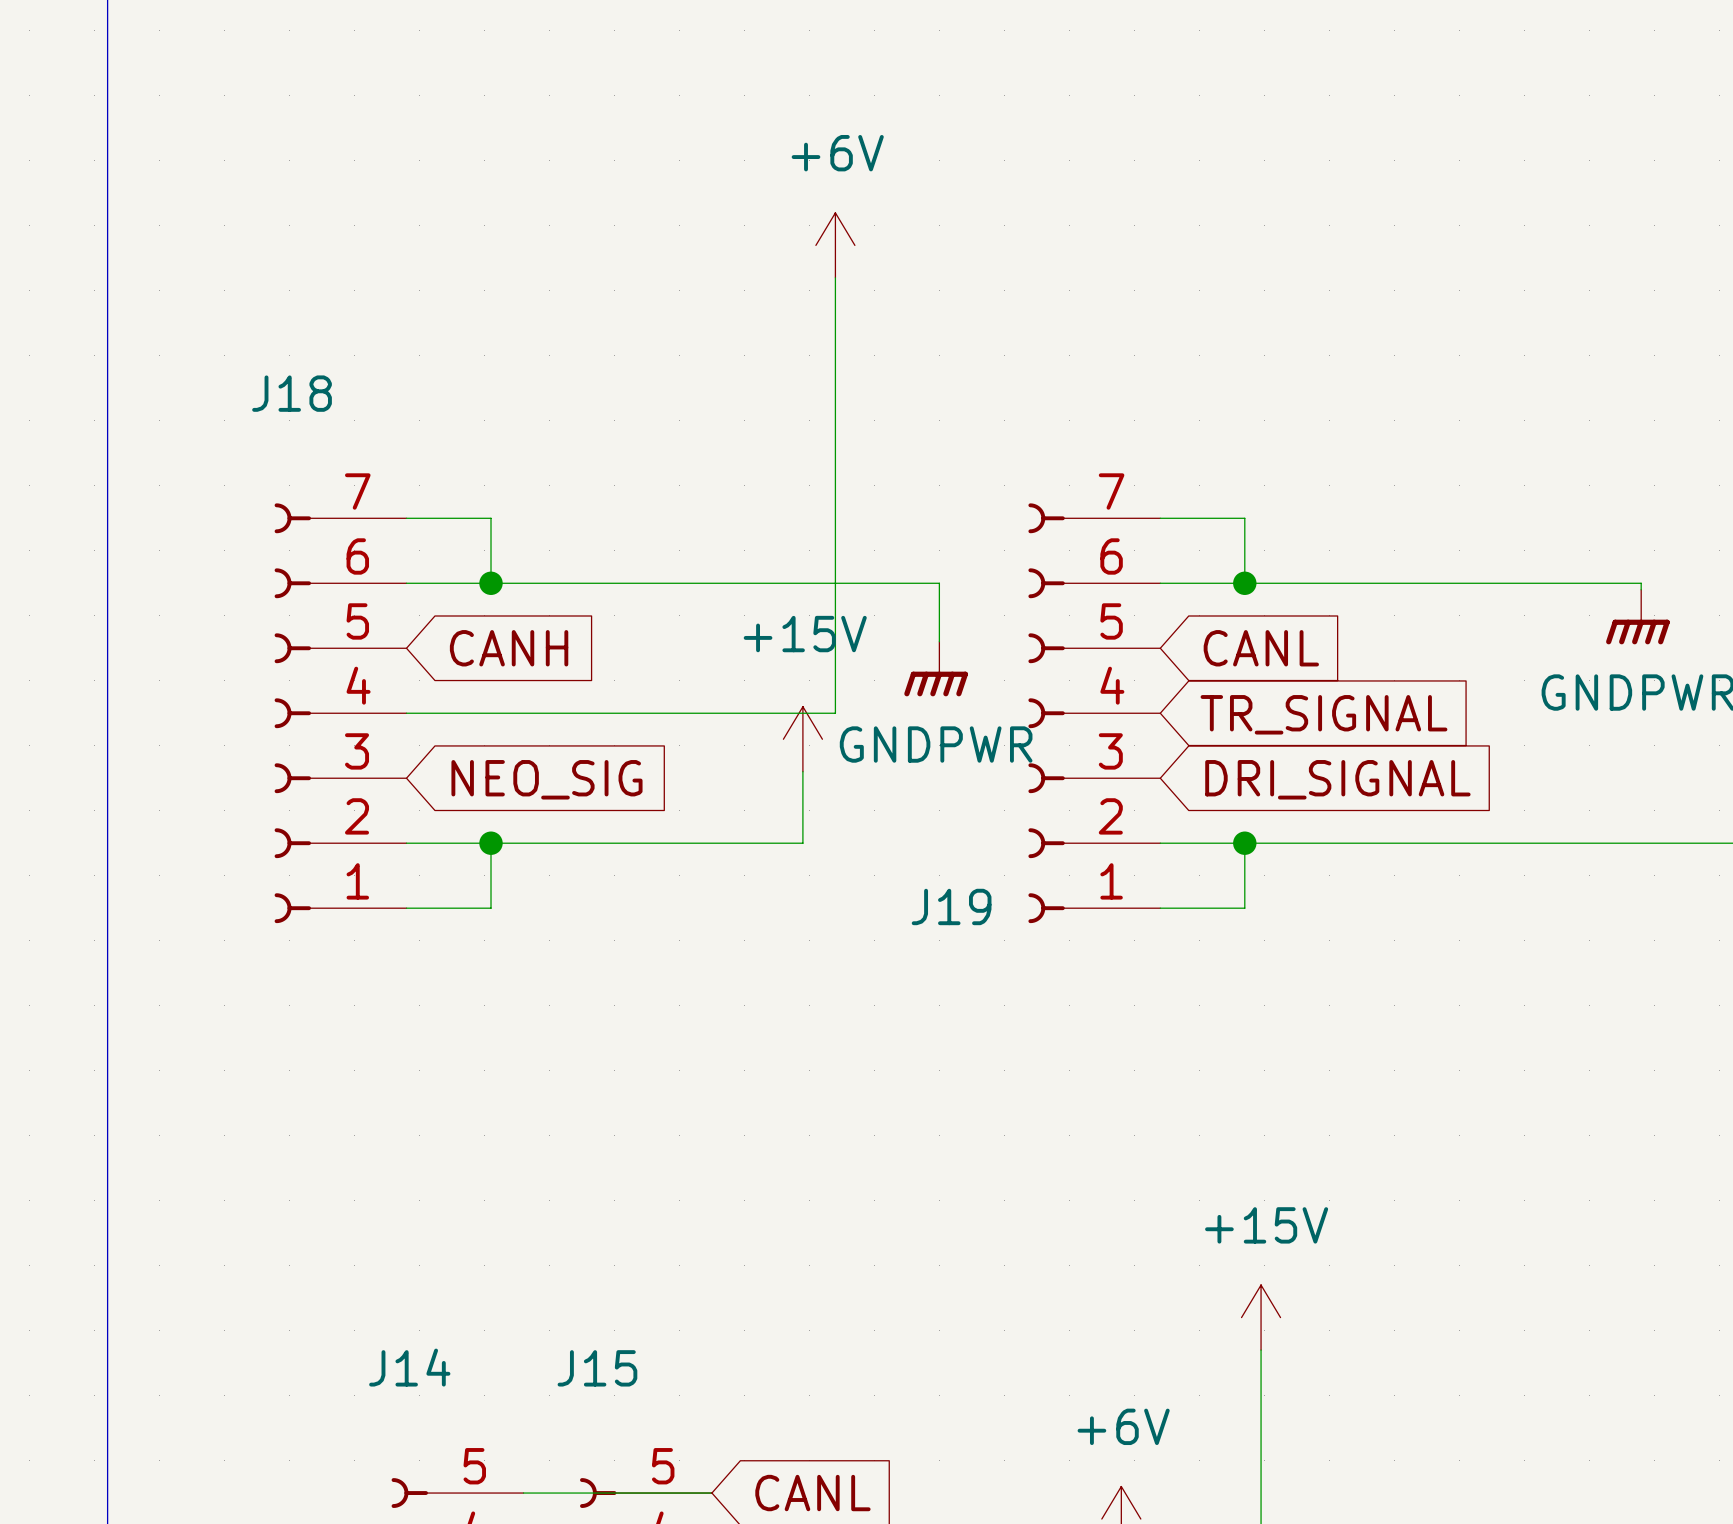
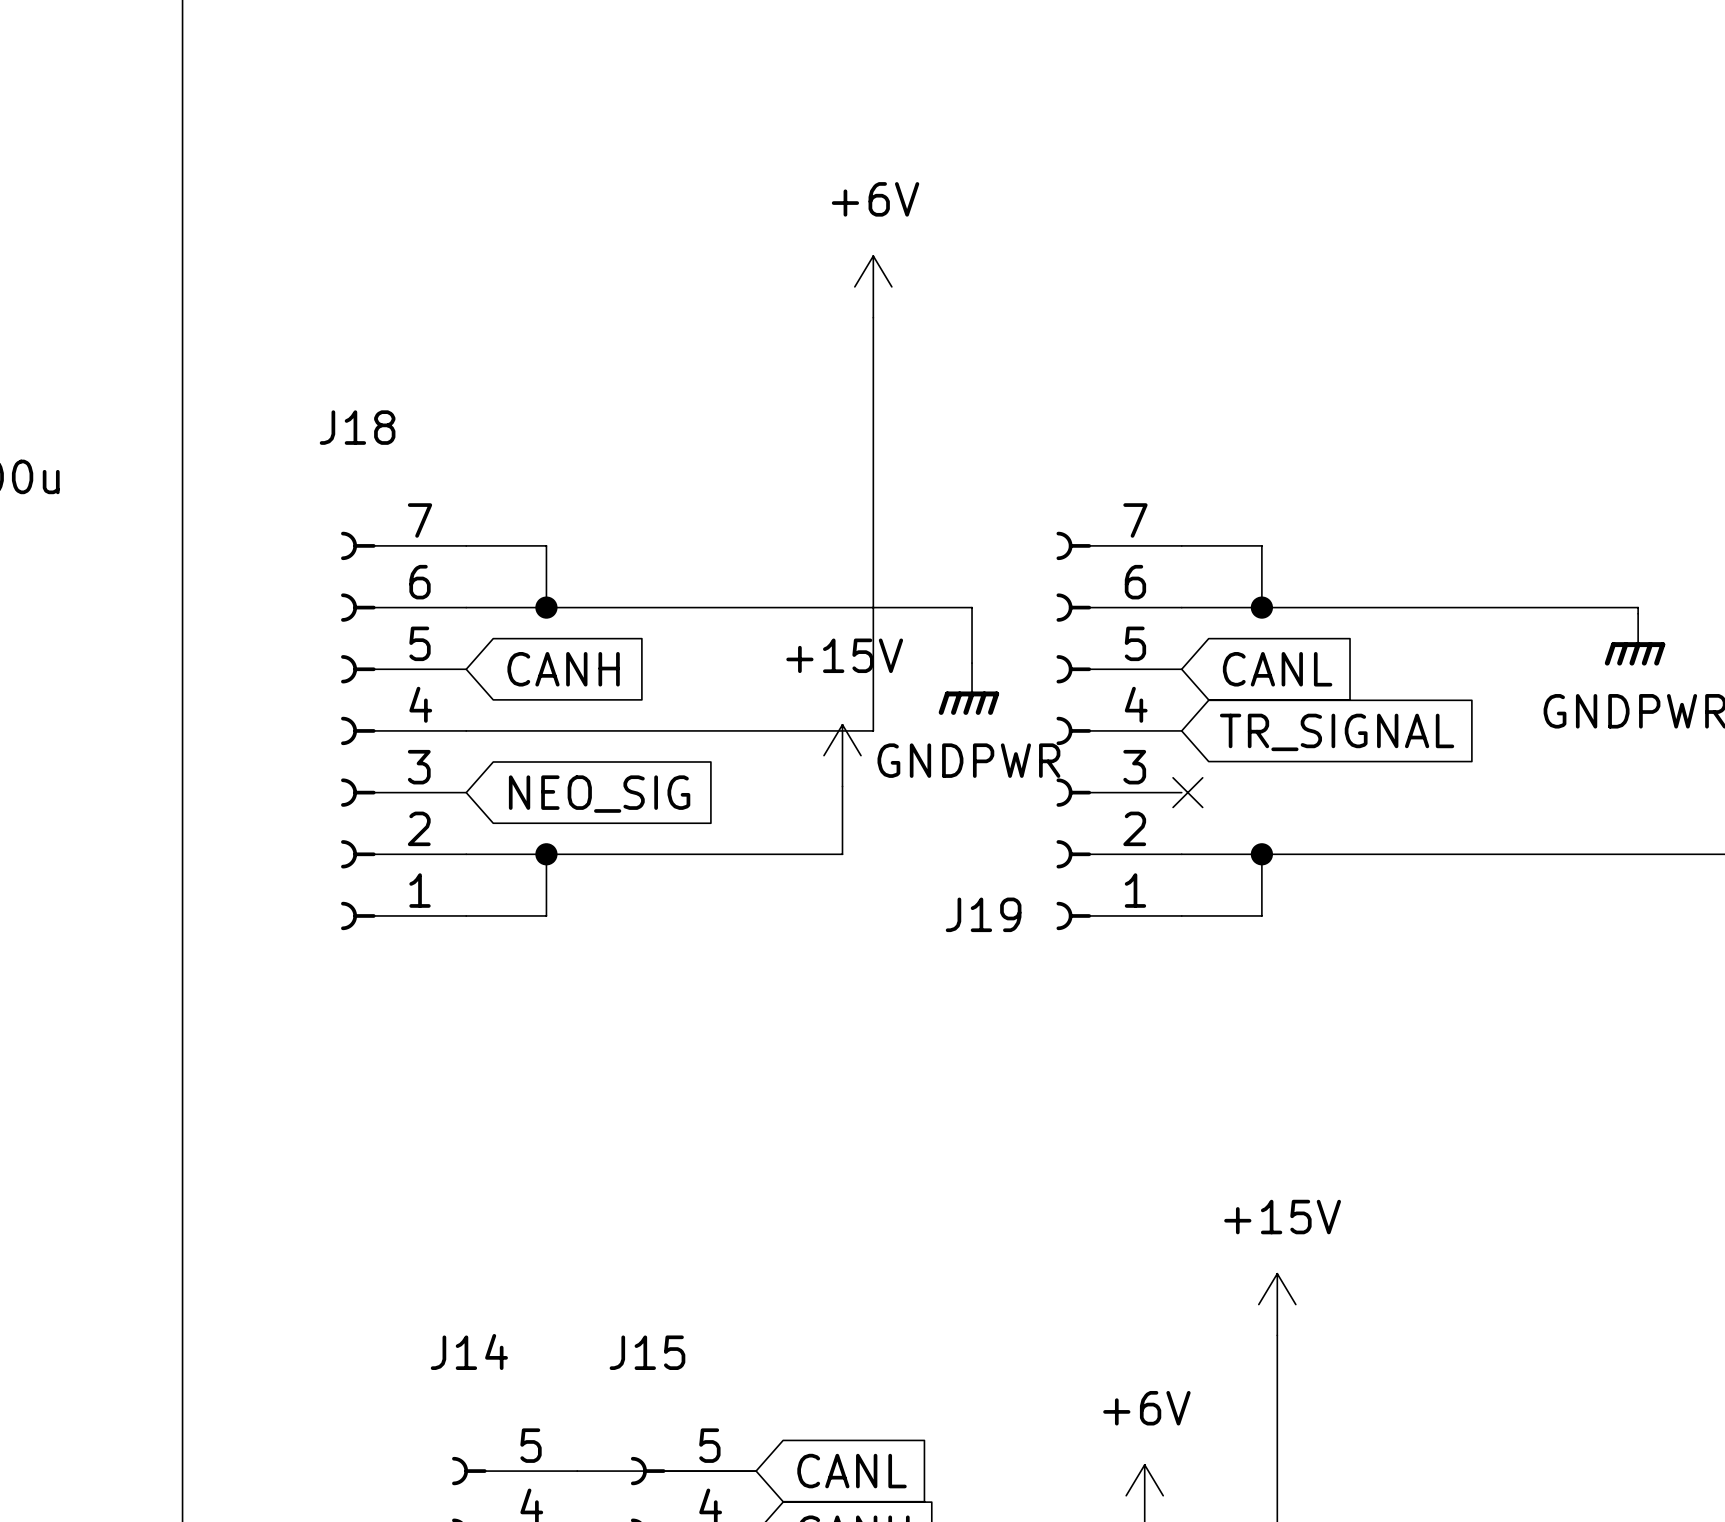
no-connect mark: none -> (1187, 792)
global label: DRI_SIGNAL (1337, 779) -> none

